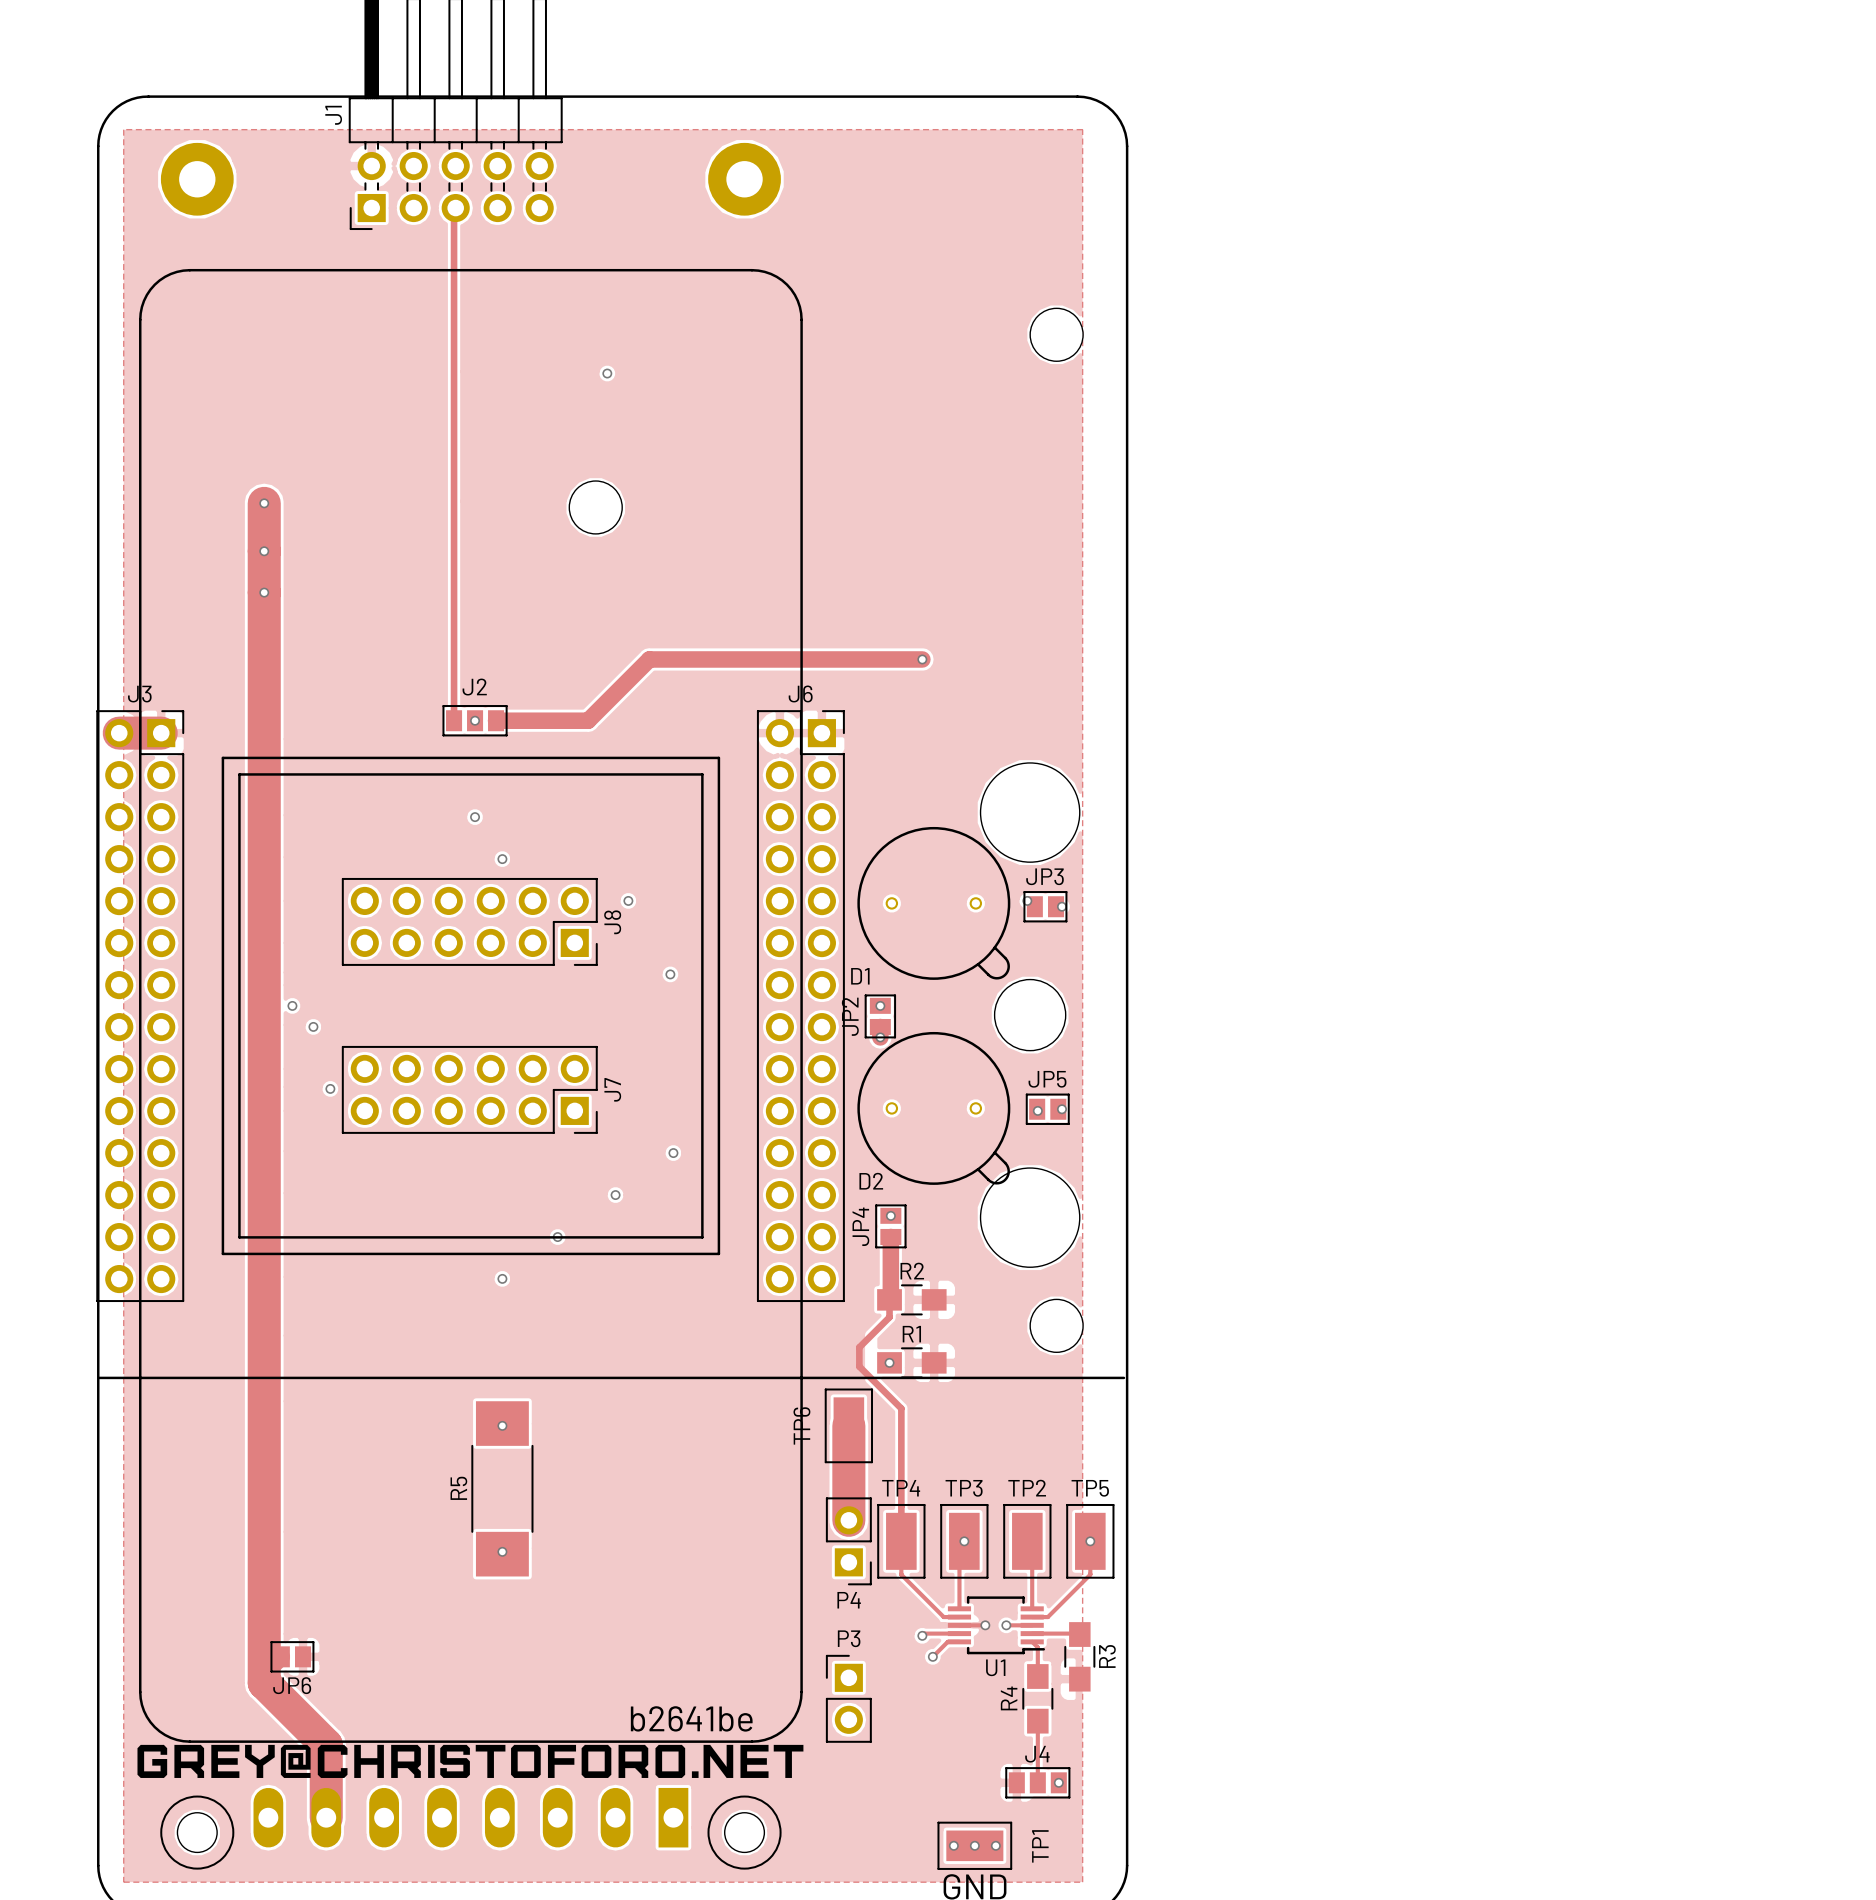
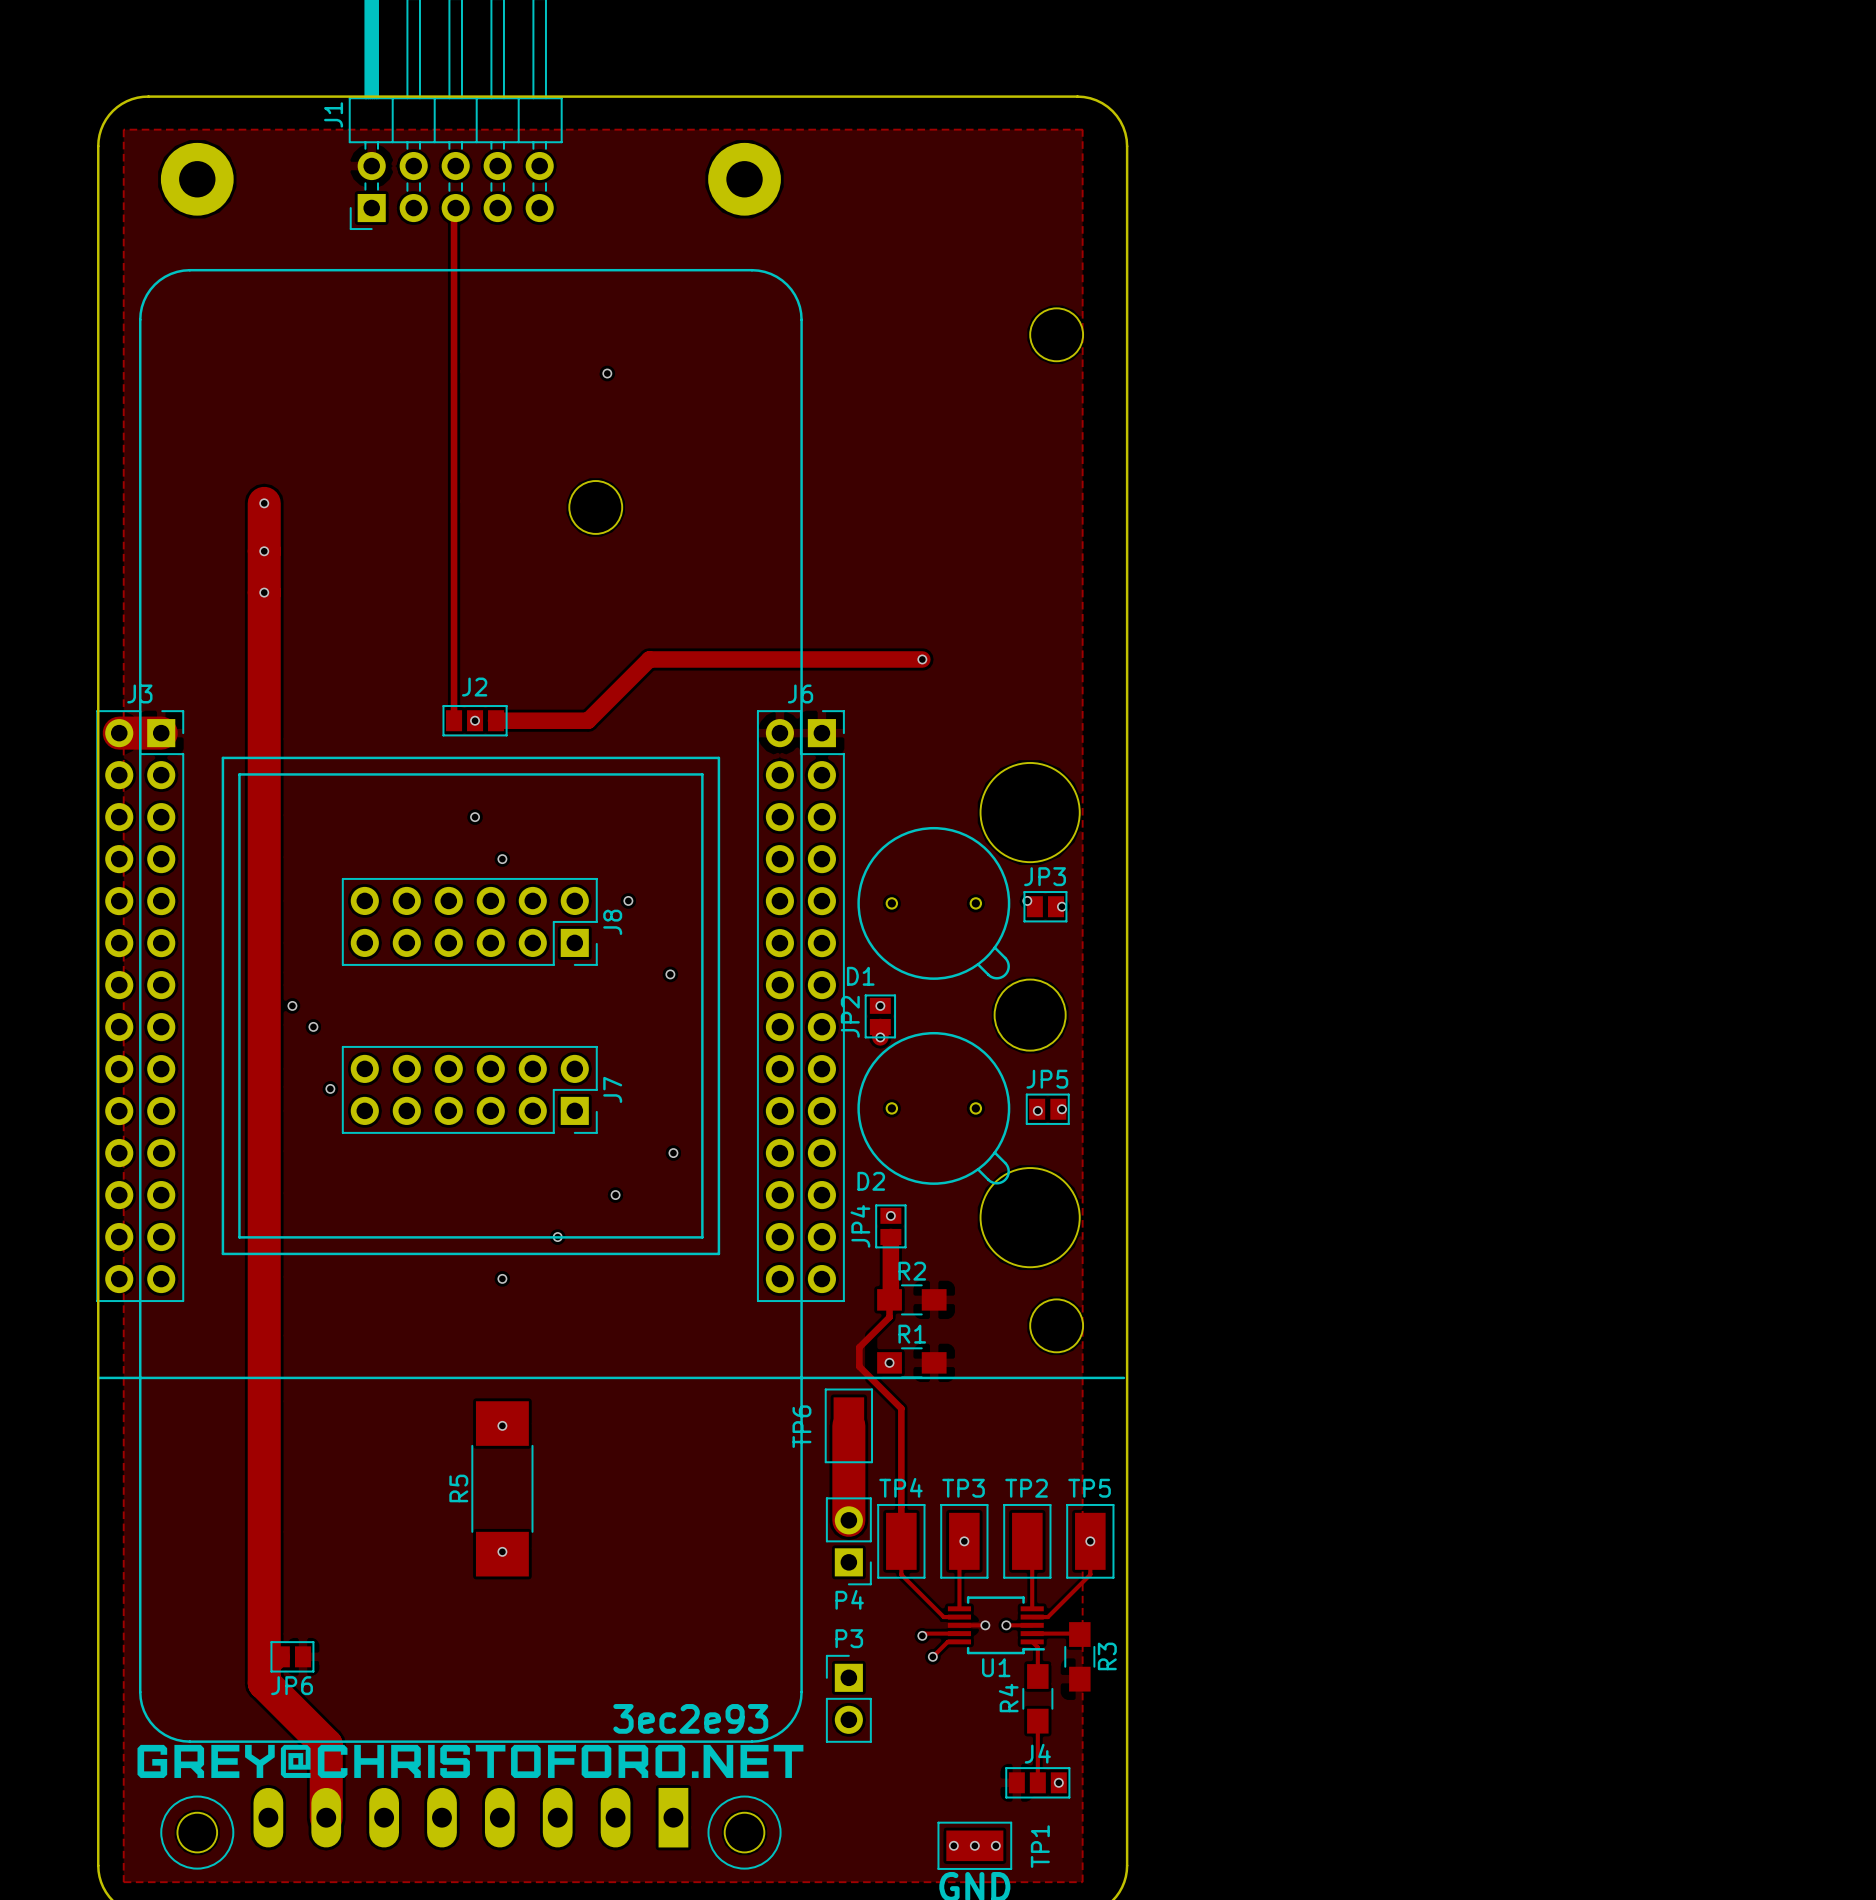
text: b2641be (691, 1718) -> 3ec2e93 (690, 1718)

